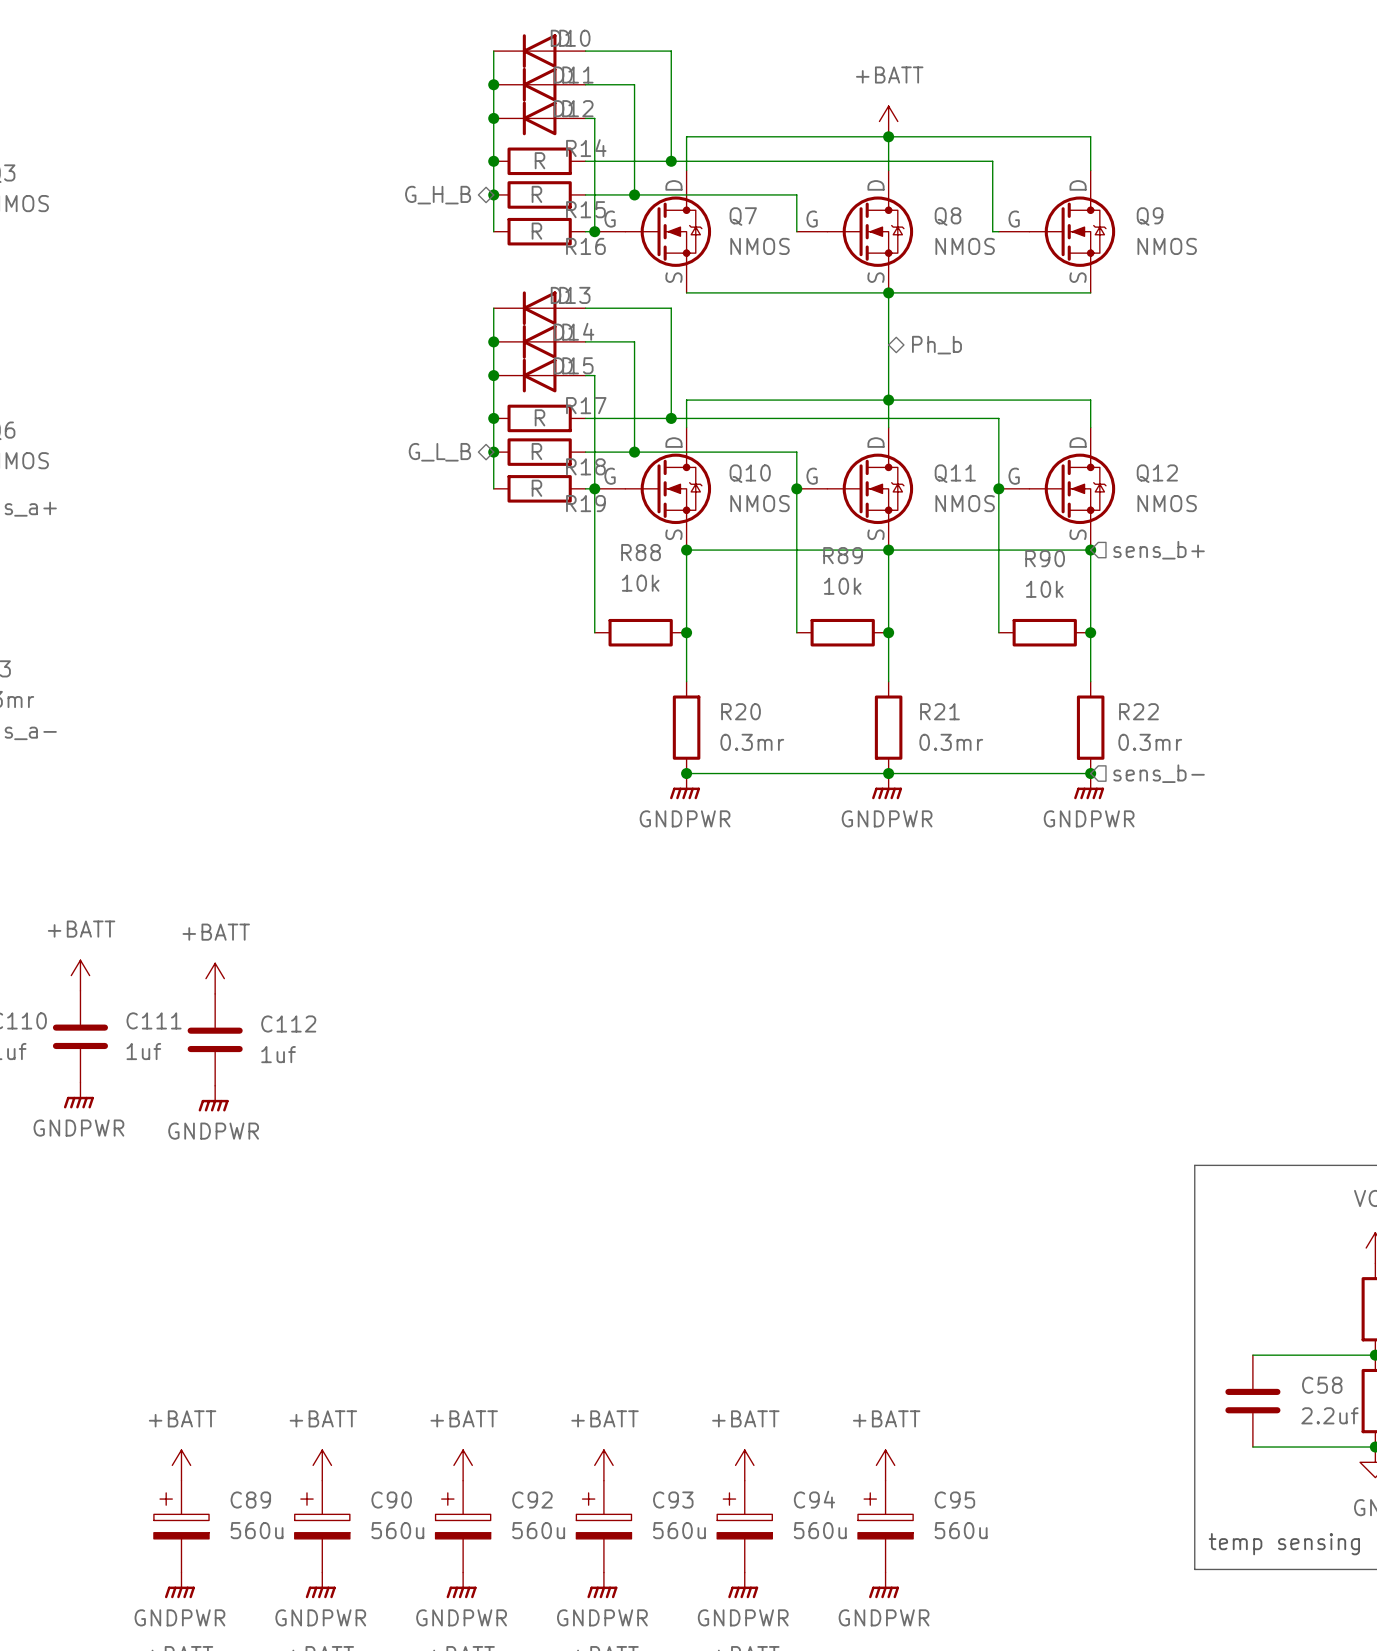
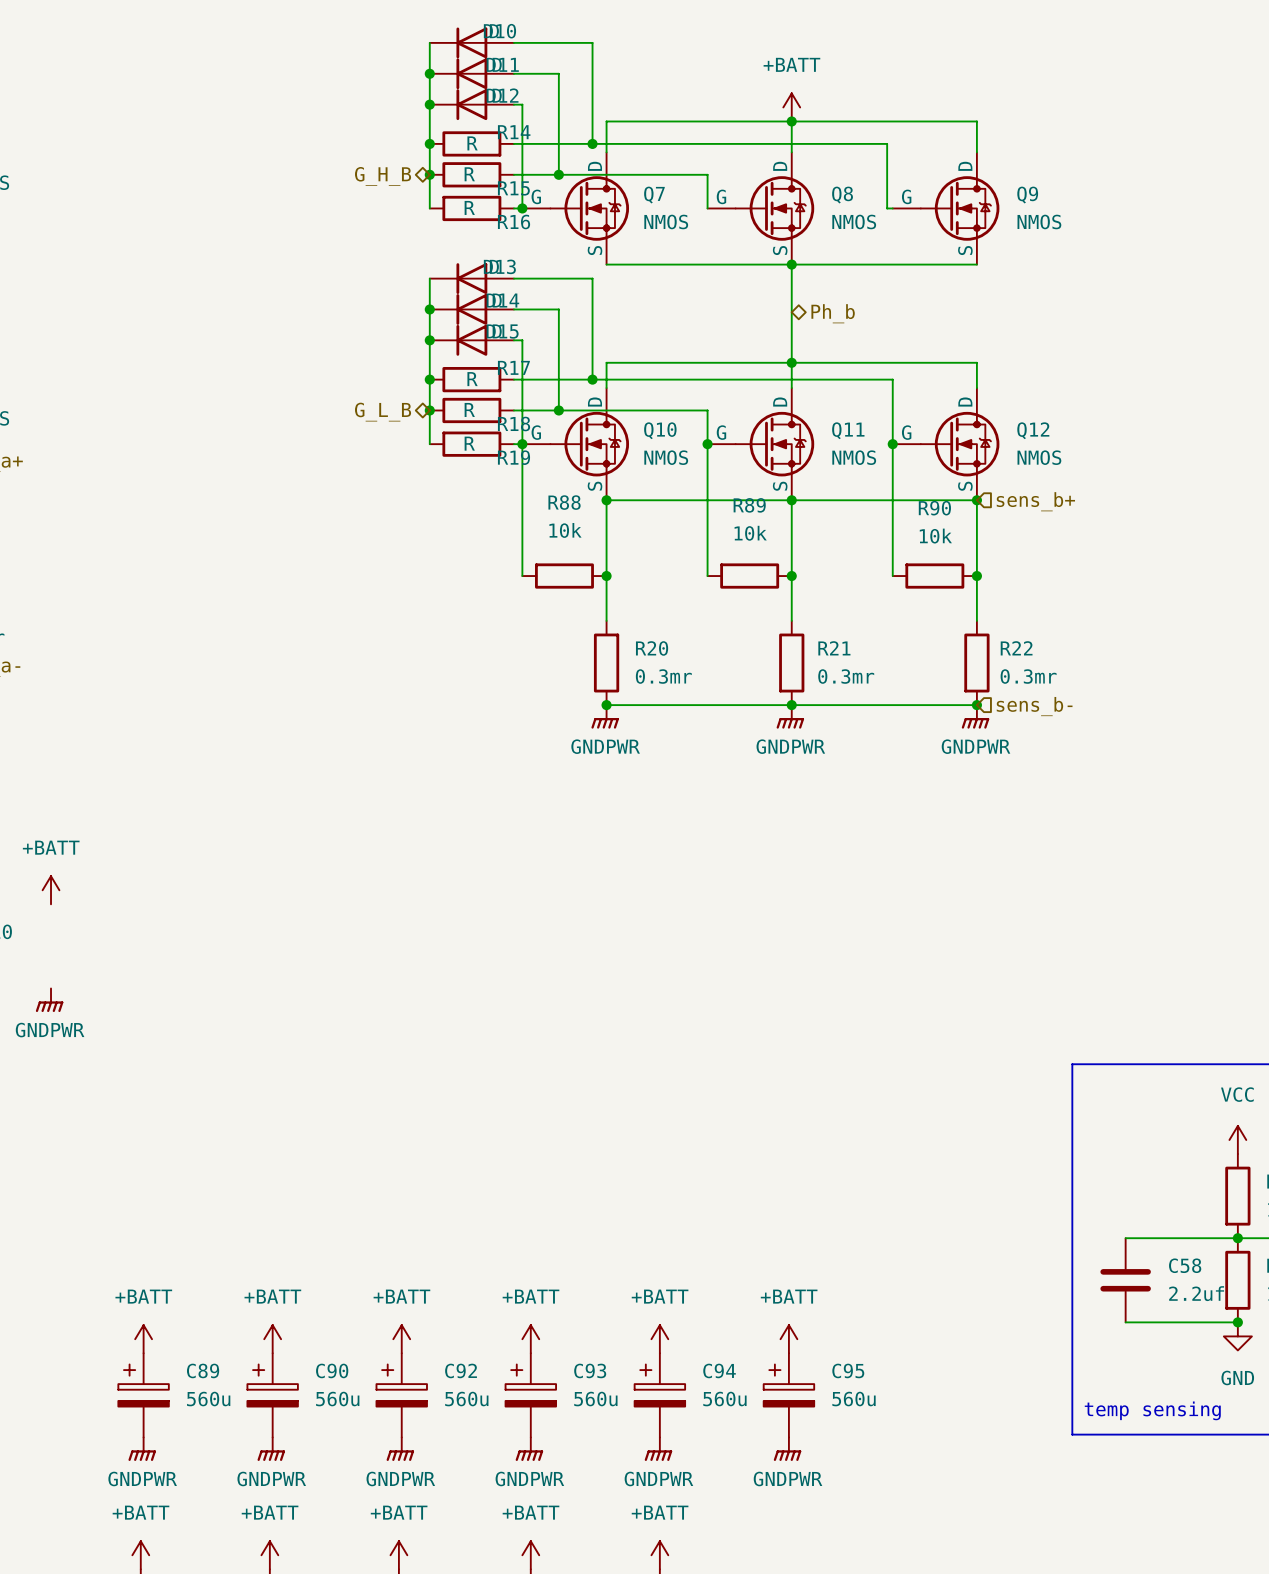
power symbol: +BATT (215, 978) -> none
C111: 1uf (80, 1036) -> none
C112: 1uf (215, 1039) -> none
power symbol: GNDPWR (213, 1098) -> none

